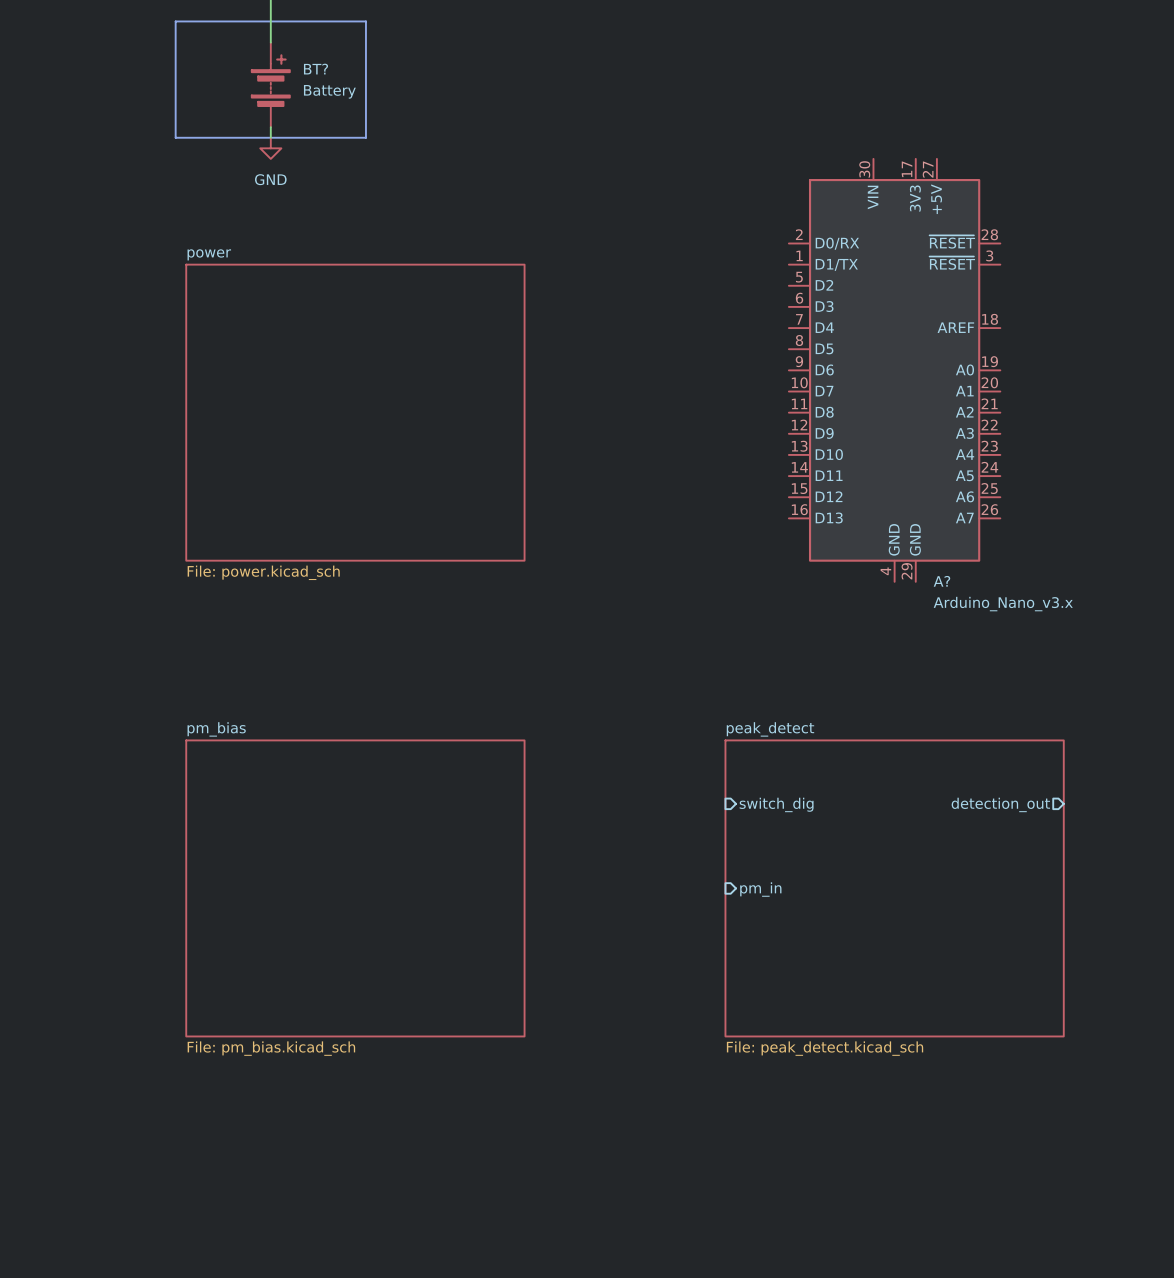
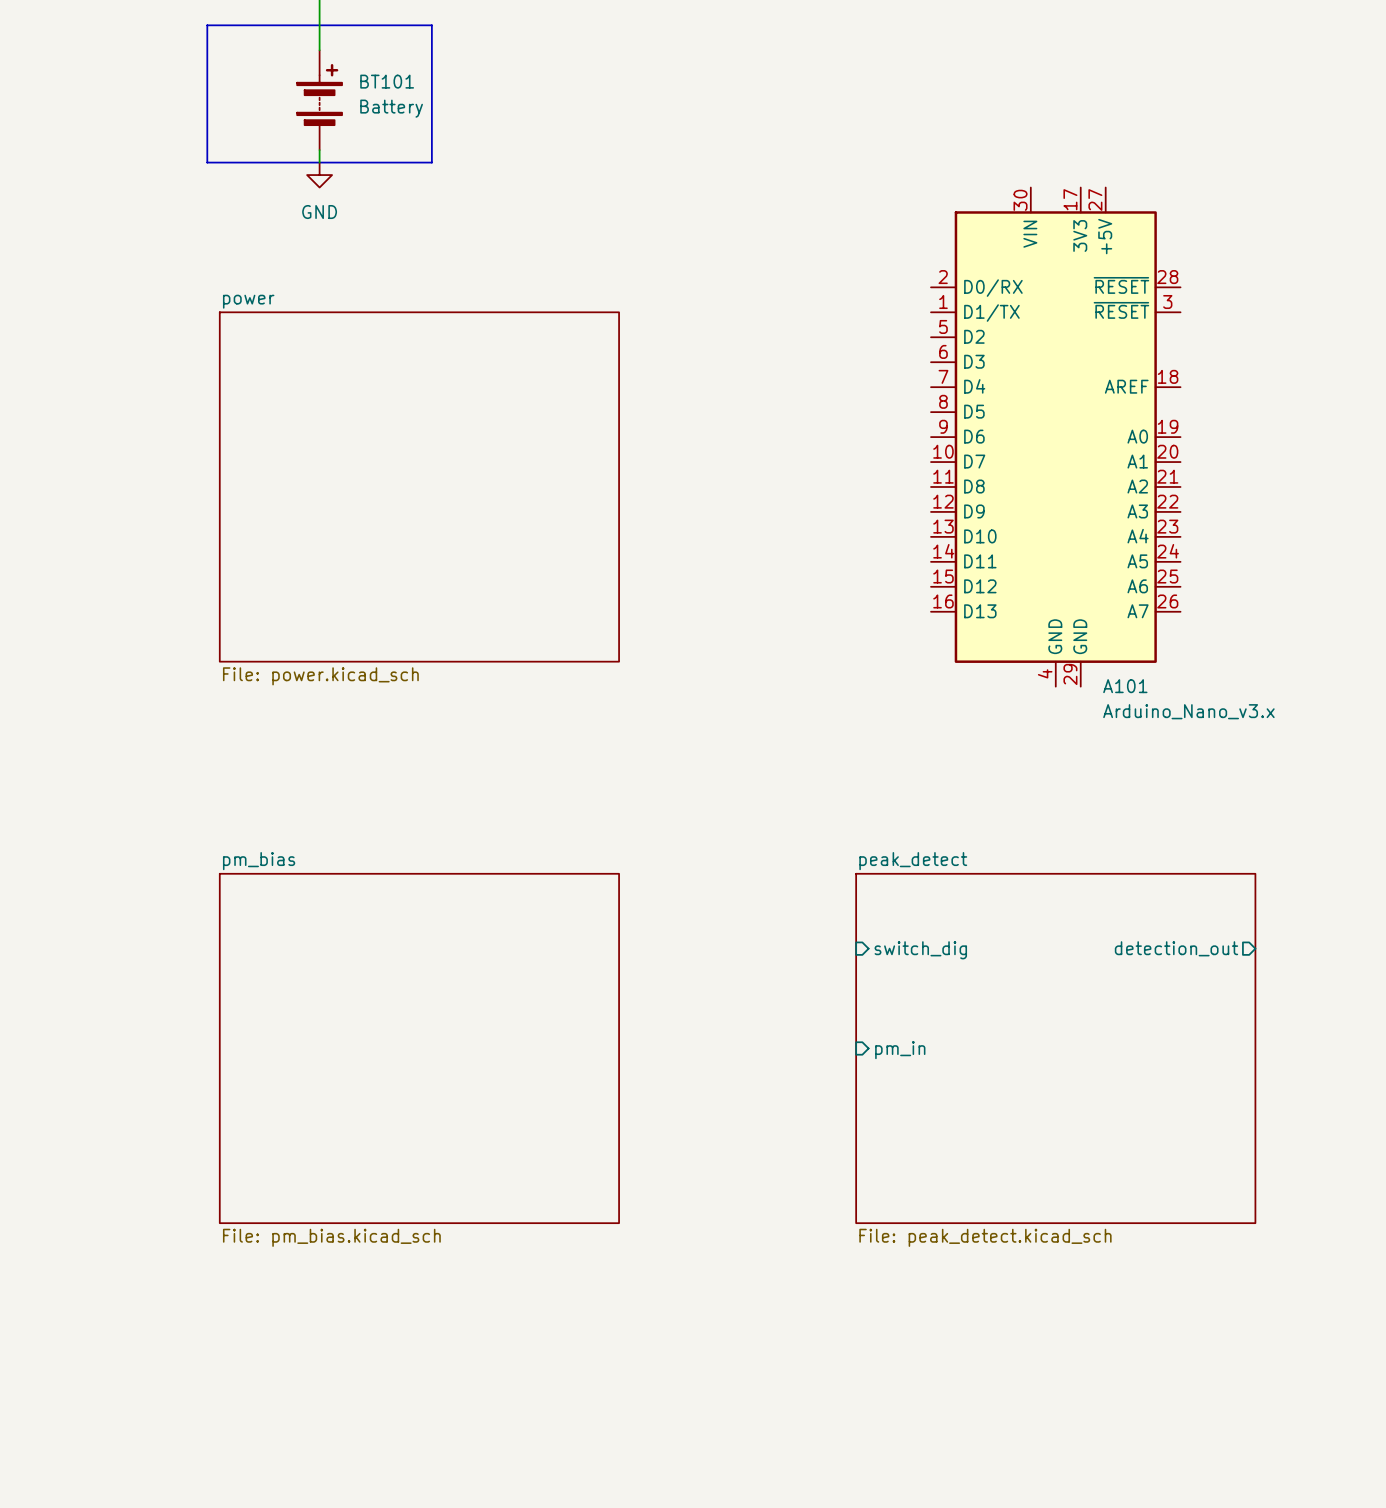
BT? name: BT? (315, 69) -> BT101 (387, 81)
A? name: A? (941, 581) -> A101 (1125, 686)

